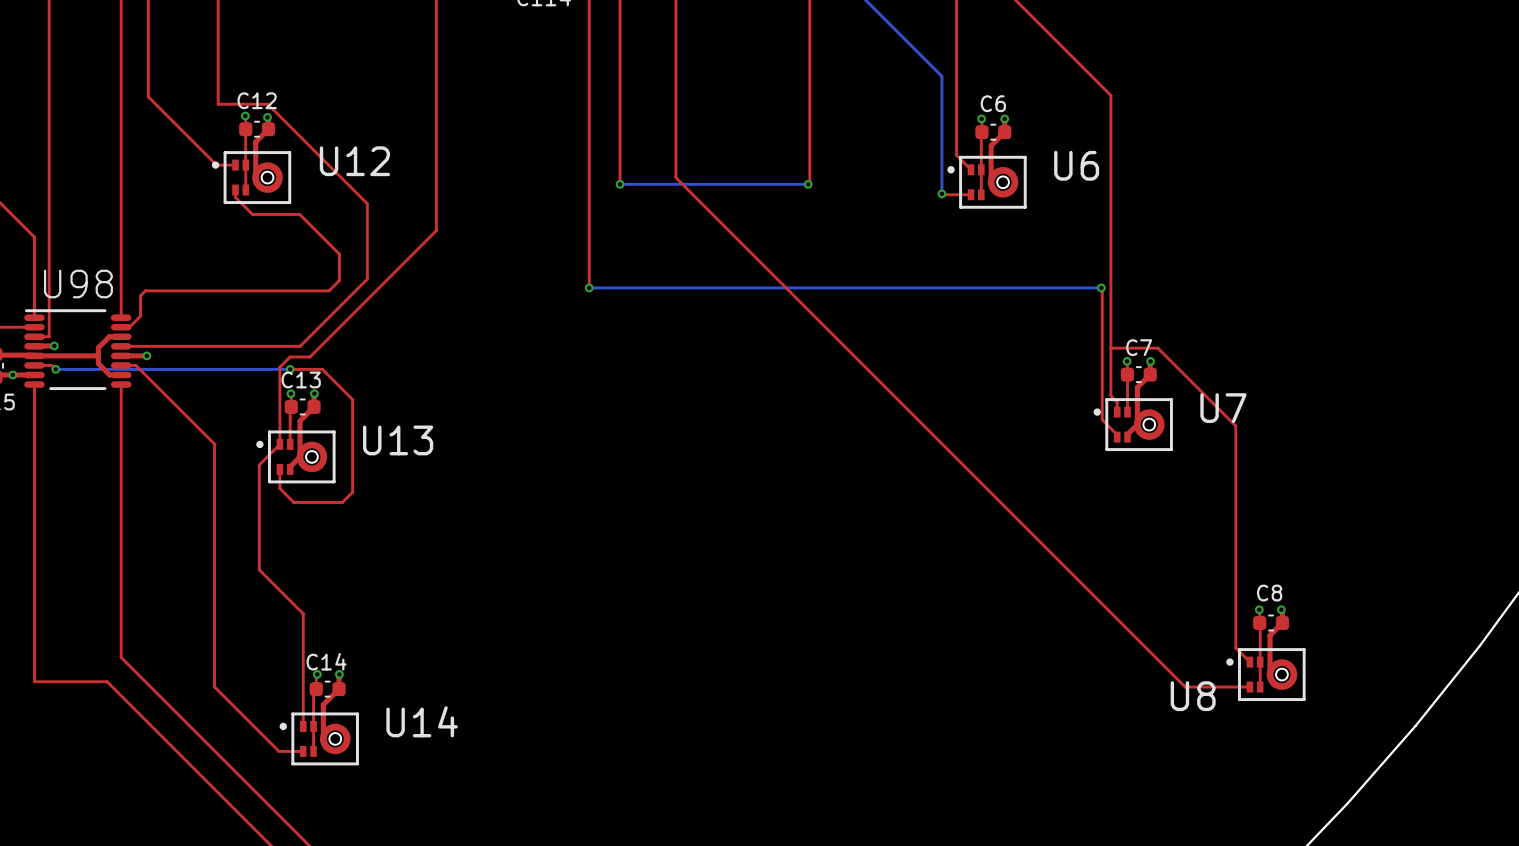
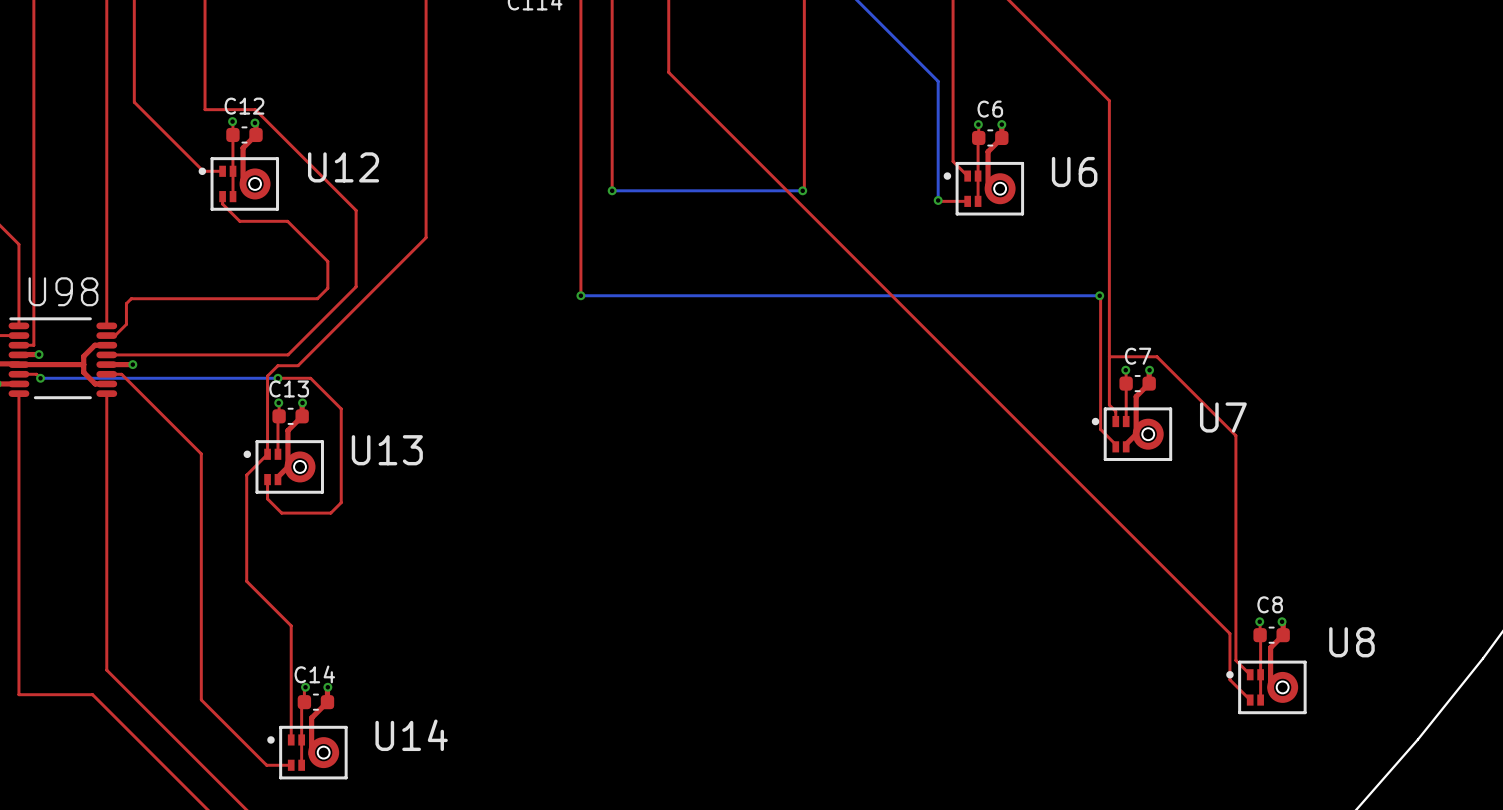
top track: (675, 67) (675, 177) (1185, 687) (1249, 687) -> (668, 72) (1229, 633) (1229, 679) (1250, 700)
U8 name position: U8 (1193, 696) -> U8 (1351, 642)

